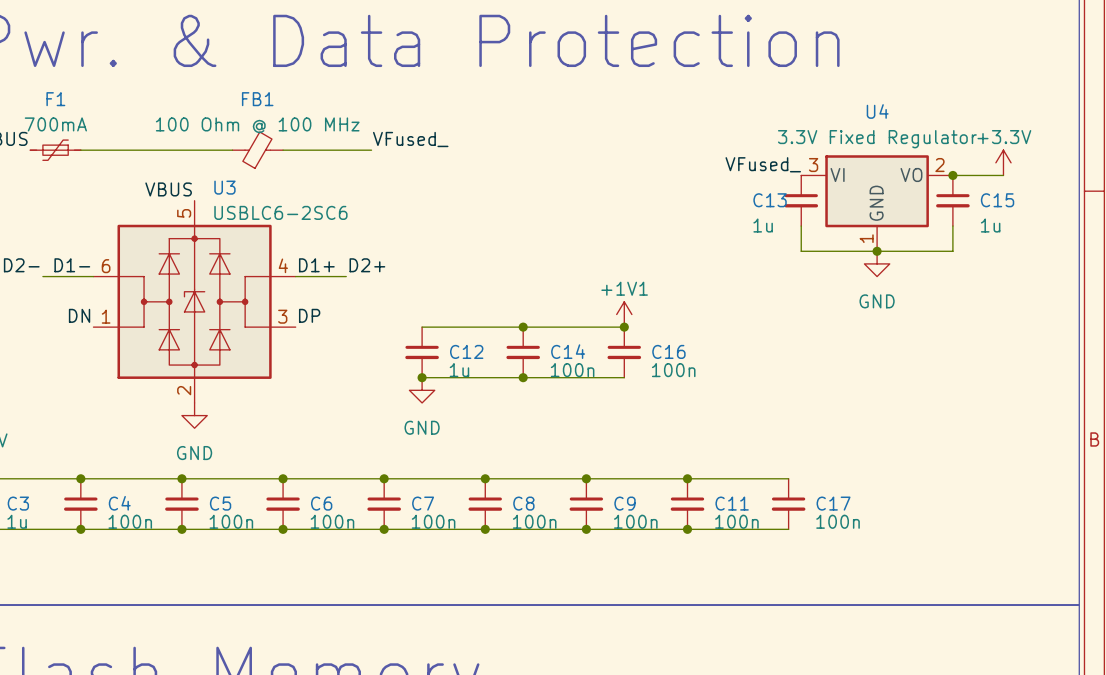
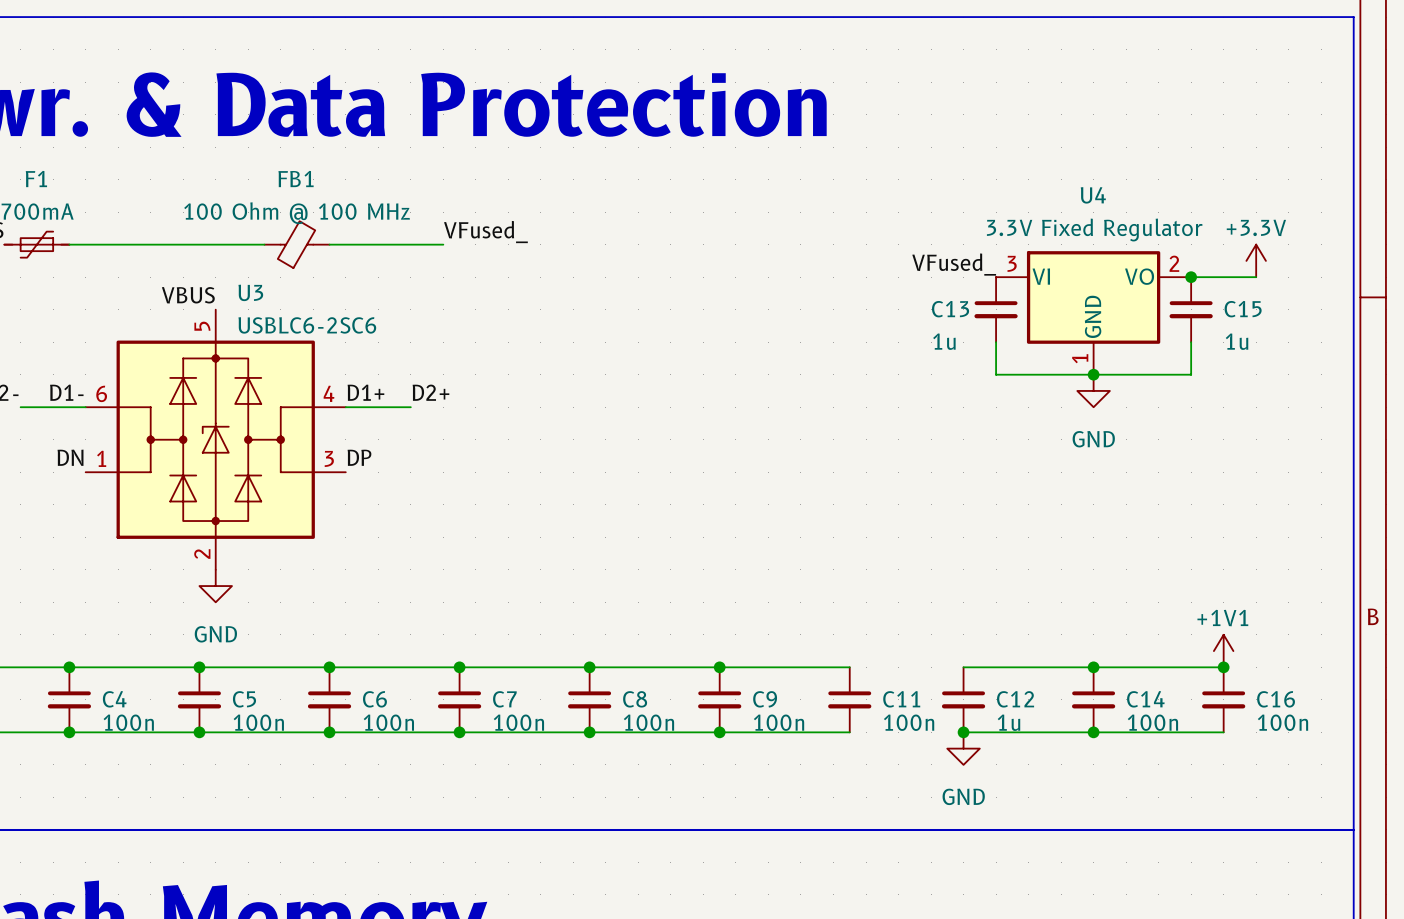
power symbol: +1V1 (624, 314) -> none
wire: (422, 327) (624, 327) -> none
junction: (523, 327) -> none
junction: (624, 327) -> none
C12 position: (422, 352) -> (963, 699)
C14 position: (523, 352) -> (1093, 699)
C16 position: (624, 352) -> (1223, 699)
wire: (422, 377) (624, 377) -> none
junction: (422, 377) -> none
junction: (523, 377) -> none
power symbol: GND (422, 390) -> none
power symbol: none -> +1V1 (1223, 651)
wire: (687, 478) (775, 478) -> none
junction: (687, 478) -> none
wire: none -> (979, 667) (1223, 667)
junction: none -> (1093, 667)
junction: none -> (1223, 667)
C17: 100n (788, 504) -> none
wire: (687, 529) (775, 529) -> none
junction: (687, 529) -> none
junction: none -> (963, 732)
wire: none -> (979, 732) (1223, 732)
junction: none -> (1093, 732)
power symbol: none -> GND (963, 748)

